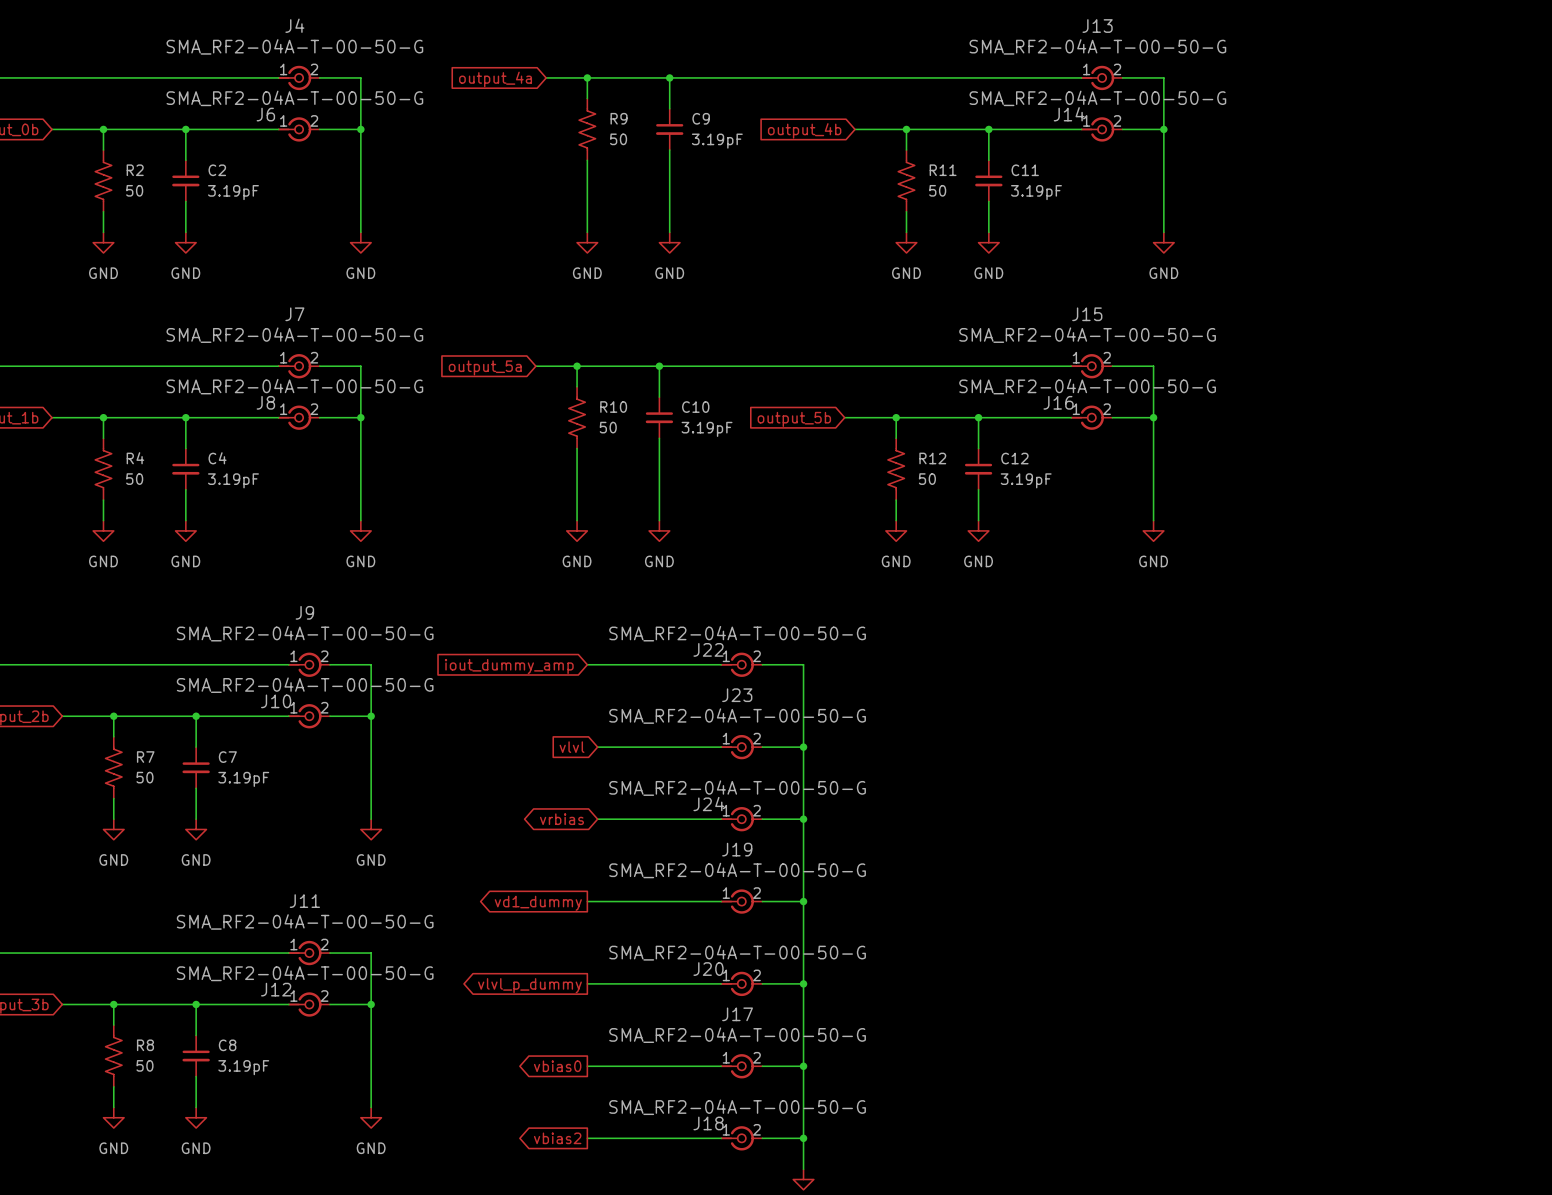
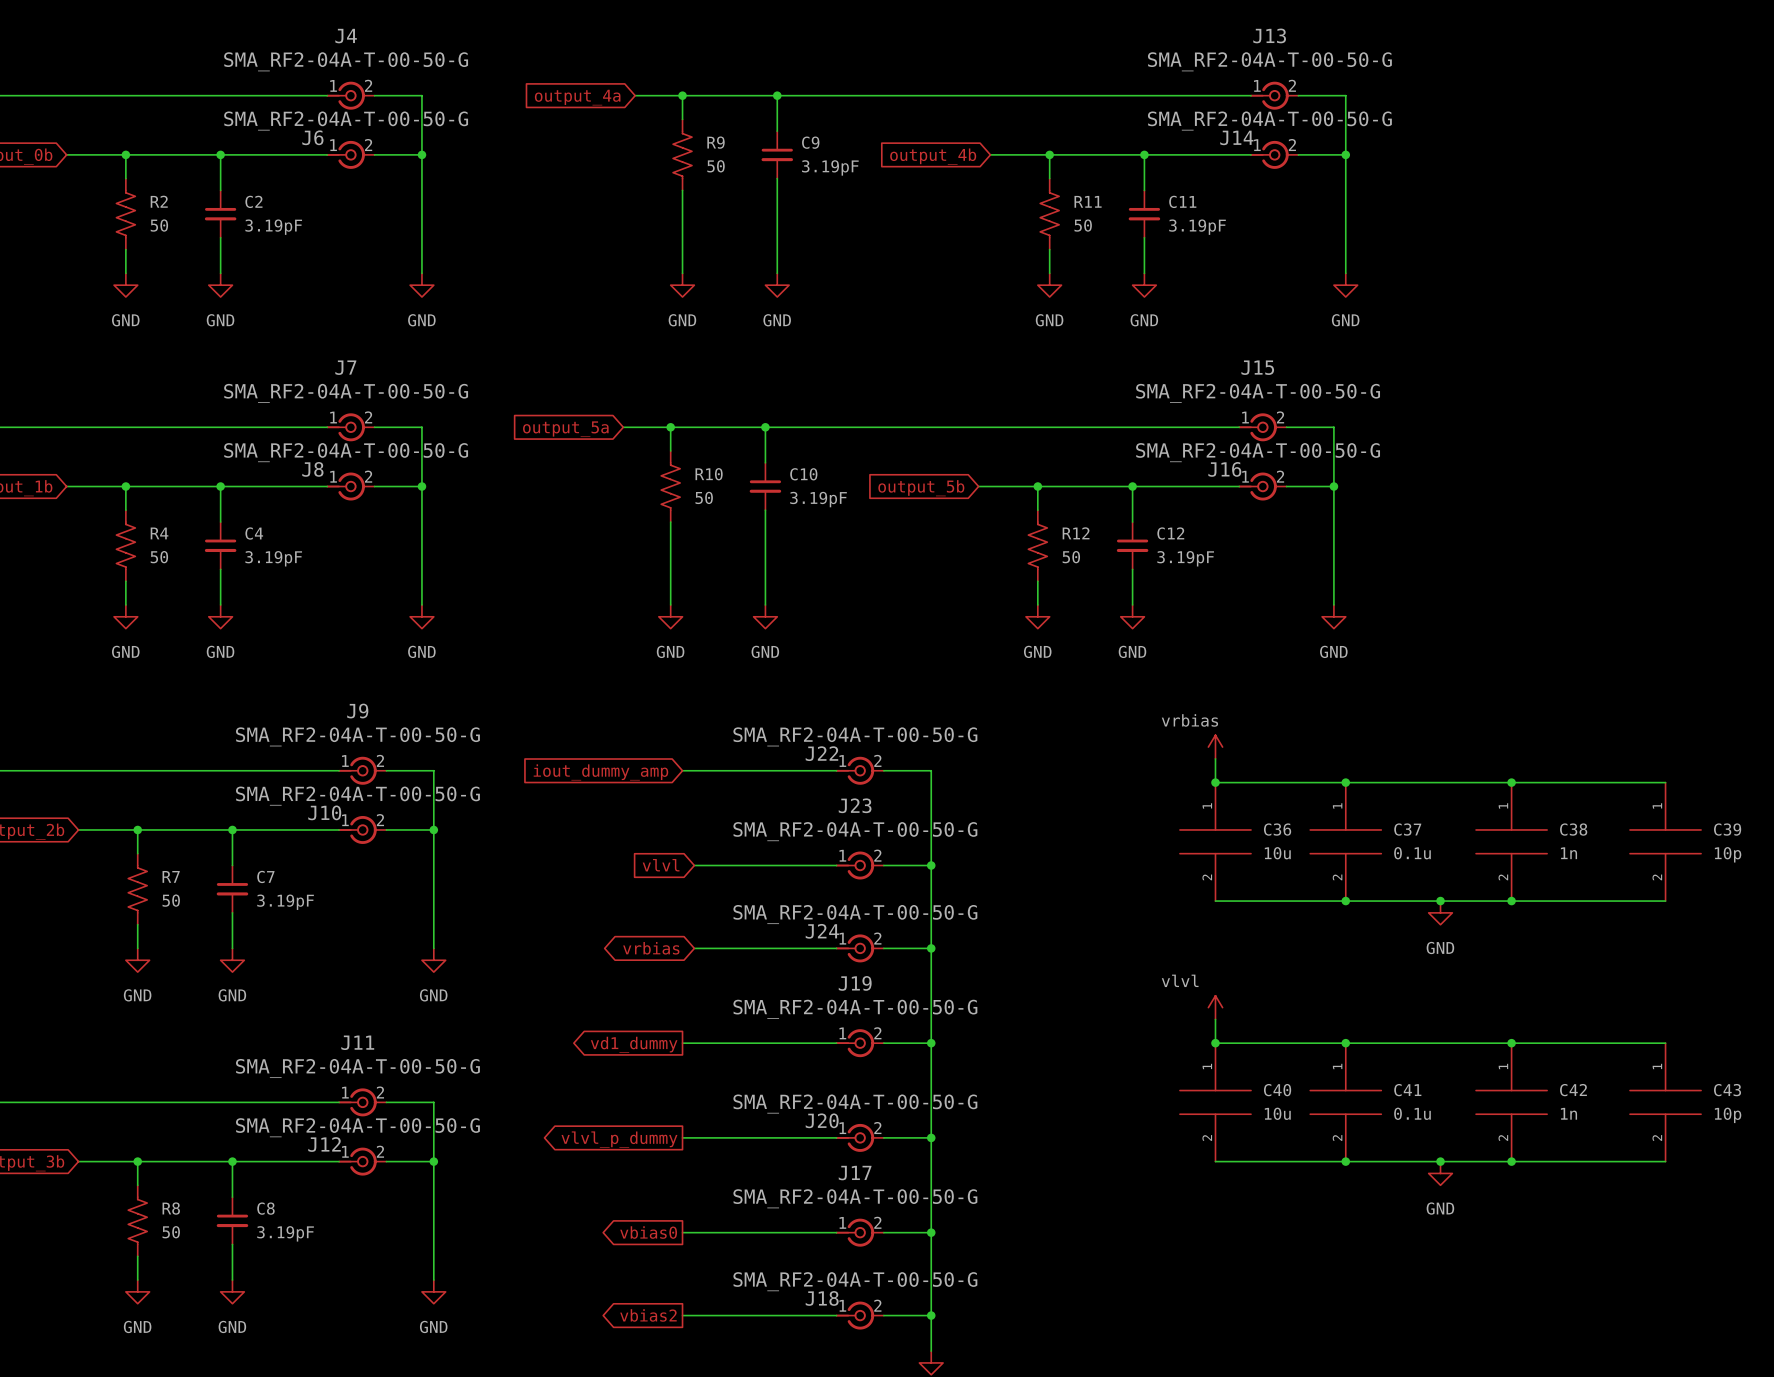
power symbol: none -> vrbias (1215, 747)
wire: none -> (1215, 758) (1215, 782) (1665, 782)
junction: none -> (1215, 782)
junction: none -> (1345, 782)
junction: none -> (1511, 782)
C36: none -> 10u (1215, 841)
C37: none -> 0.1u (1345, 841)
C38: none -> 1n (1511, 841)
C39: none -> 10p (1665, 841)
wire: none -> (1215, 901) (1665, 901)
junction: none -> (1345, 901)
junction: none -> (1440, 901)
junction: none -> (1511, 901)
power symbol: none -> GND (1440, 912)
power symbol: none -> vlvl (1215, 1007)
wire: none -> (1215, 1019) (1215, 1043) (1665, 1043)
junction: none -> (1215, 1043)
junction: none -> (1345, 1043)
junction: none -> (1511, 1043)
C40: none -> 10u (1215, 1102)
C41: none -> 0.1u (1345, 1102)
C42: none -> 1n (1511, 1102)
C43: none -> 10p (1665, 1102)
wire: none -> (1215, 1161) (1665, 1161)
junction: none -> (1345, 1161)
junction: none -> (1440, 1161)
junction: none -> (1511, 1161)
power symbol: none -> GND (1440, 1173)

